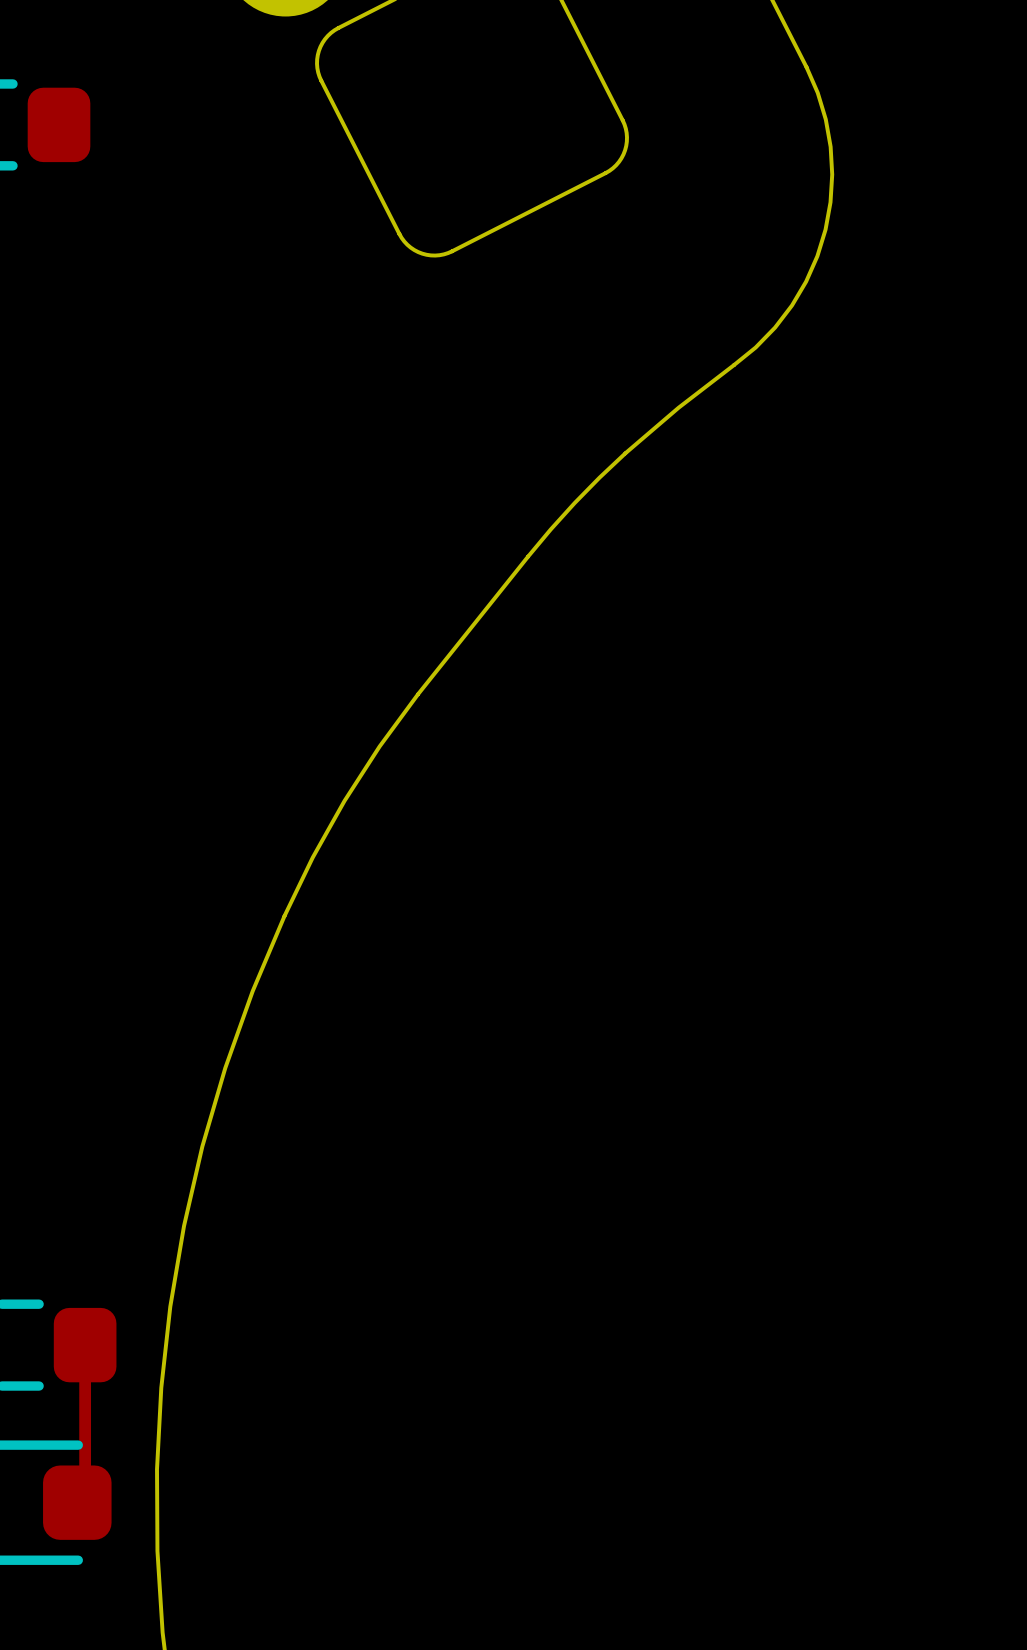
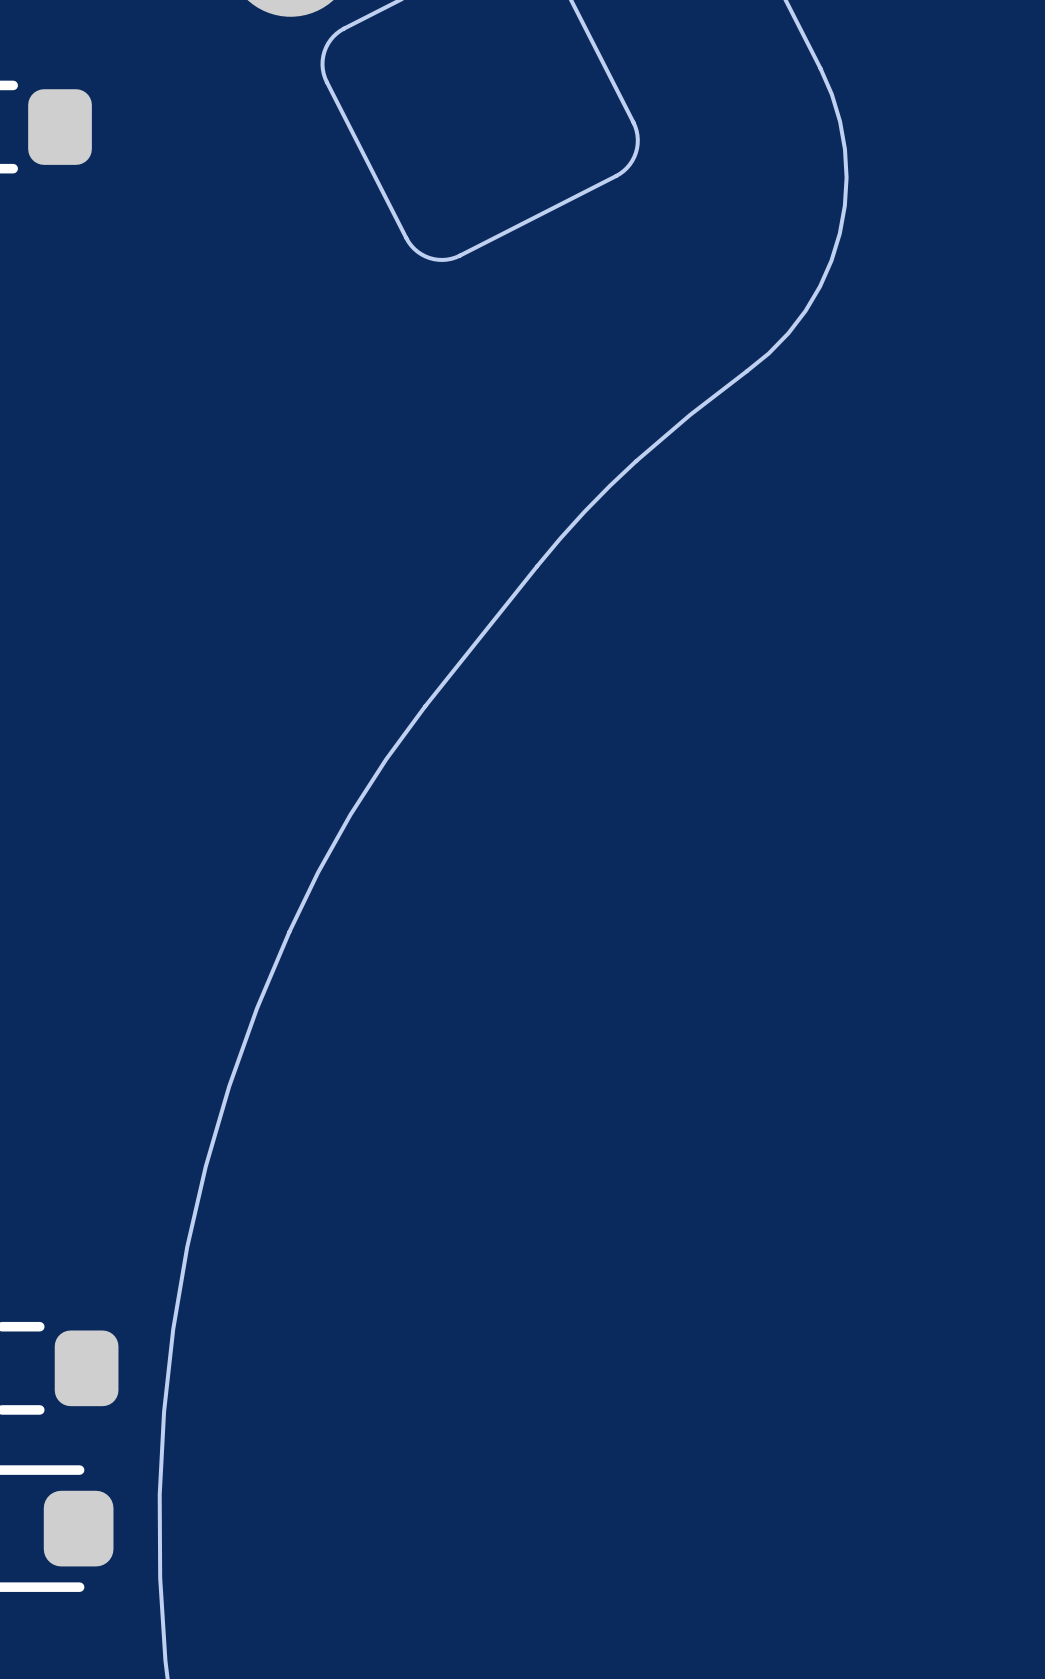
track: (85, 1345) (85, 1494) (77, 1502) -> none

